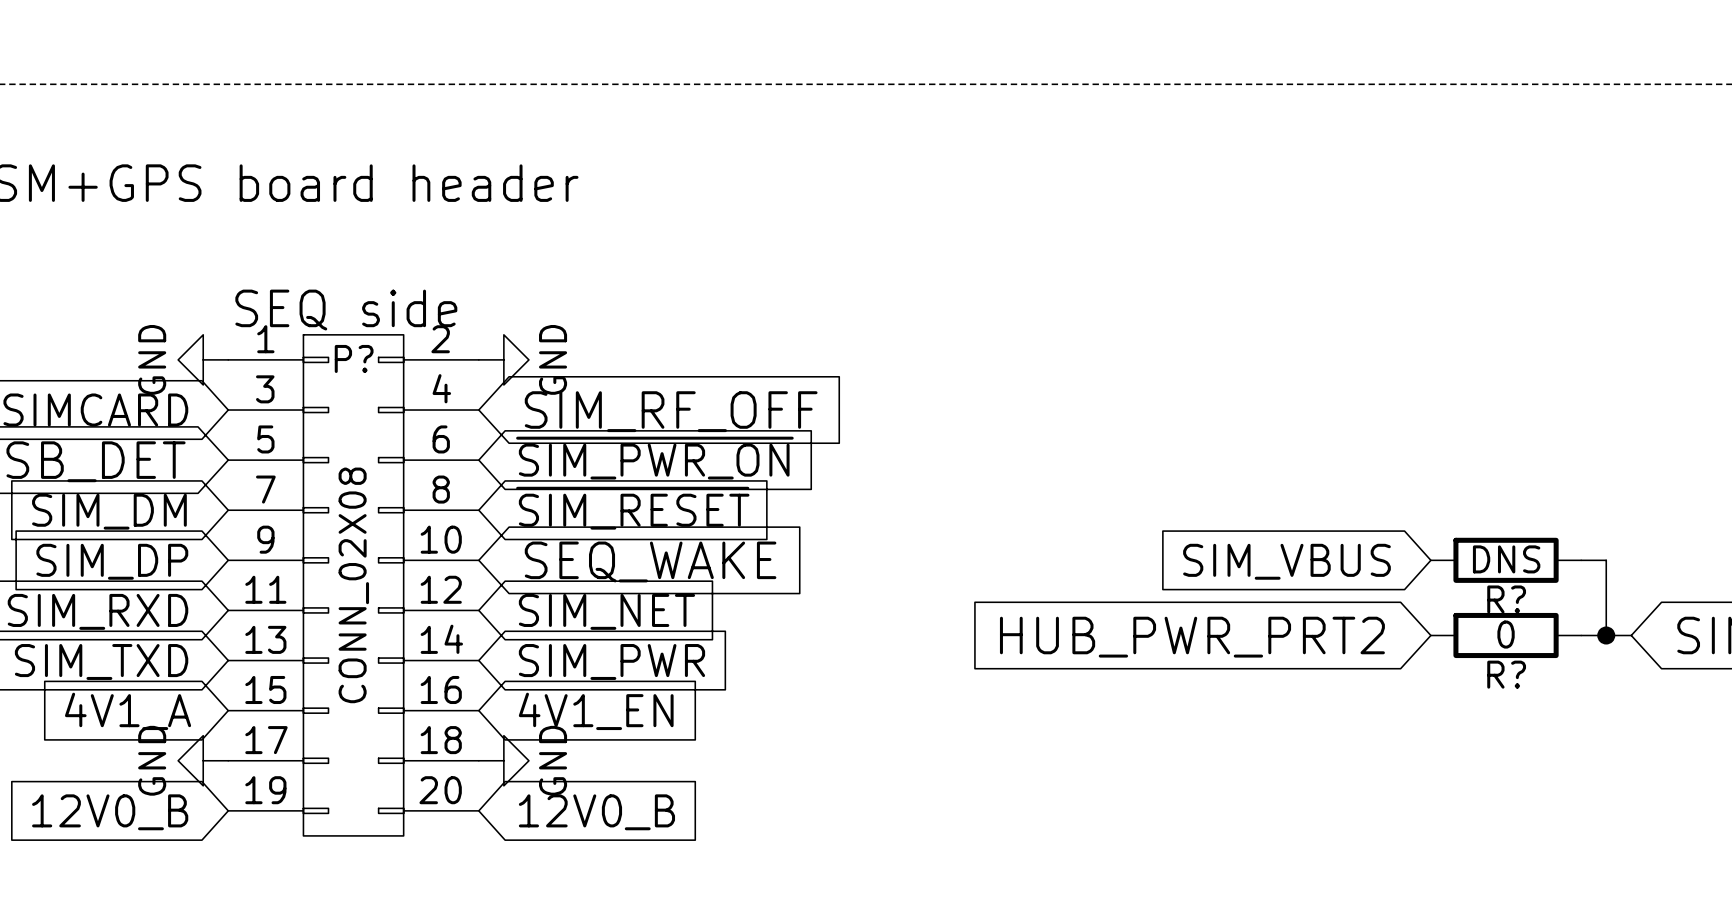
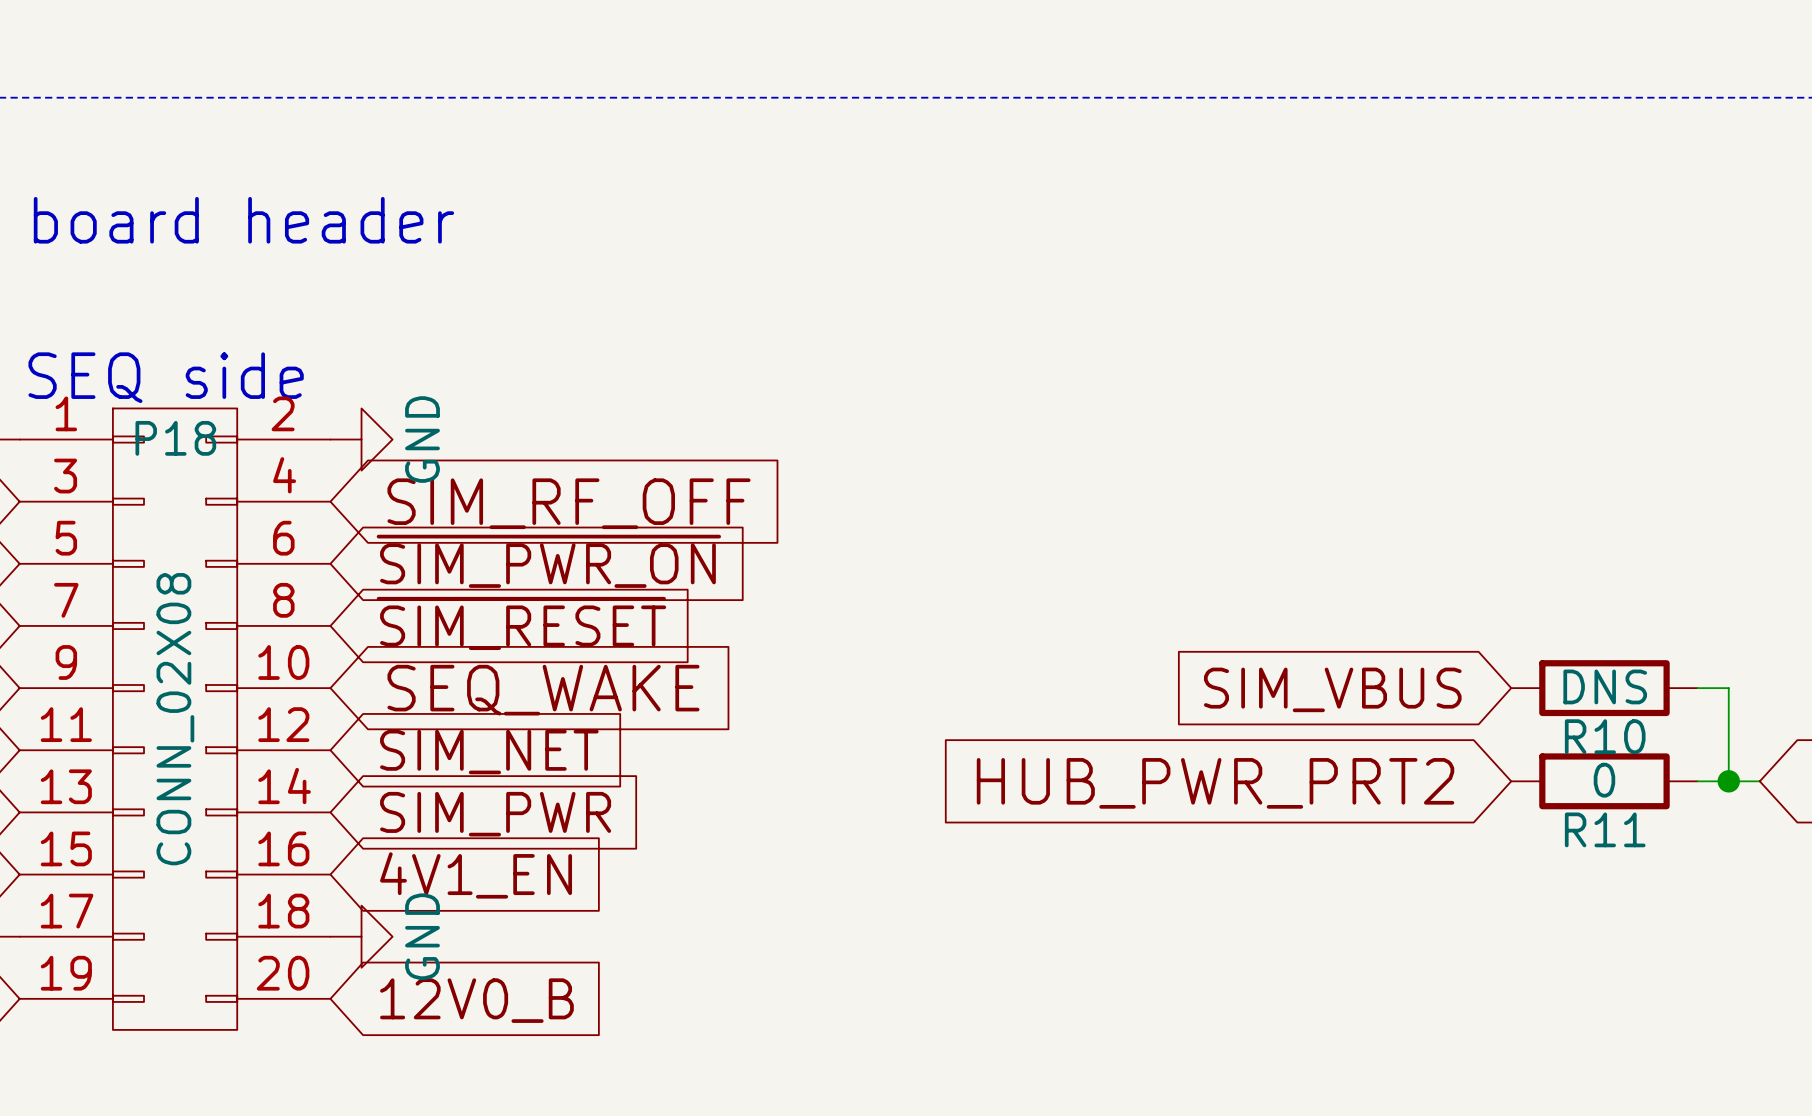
P? name: P? (354, 358) -> P18 (175, 438)
R? name: R? (1506, 599) -> R10 (1605, 736)
R? name: R? (1506, 674) -> R11 (1605, 829)

